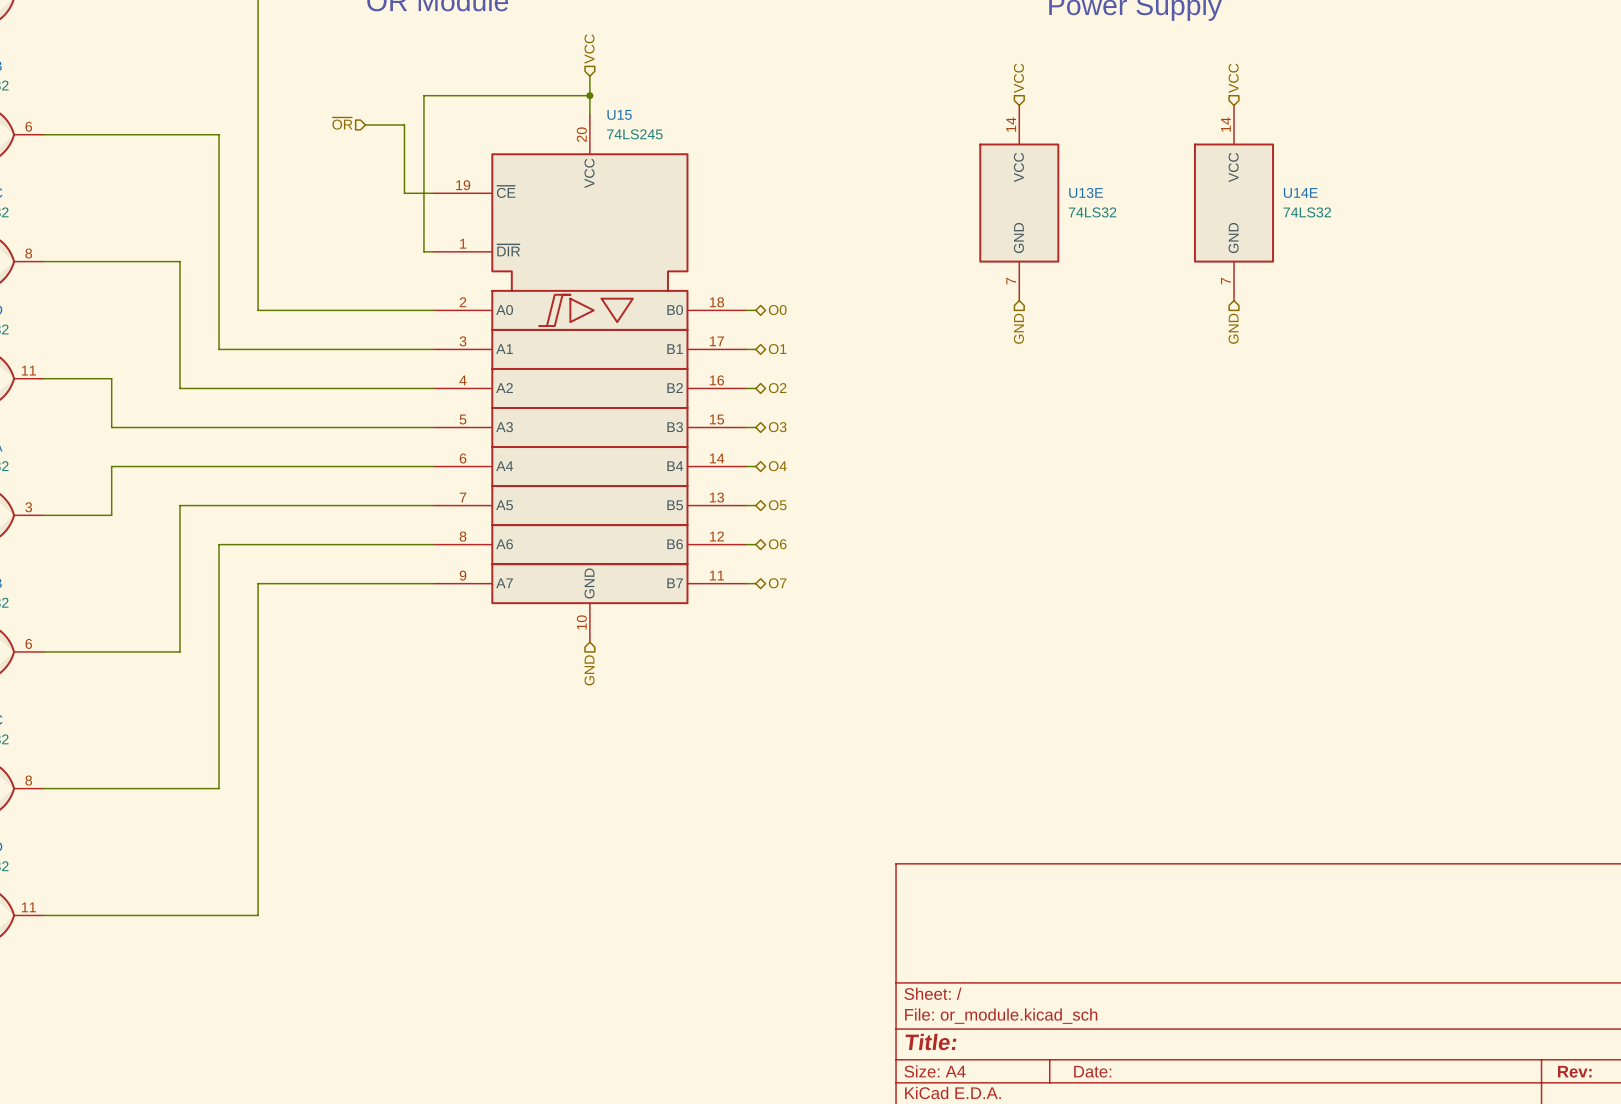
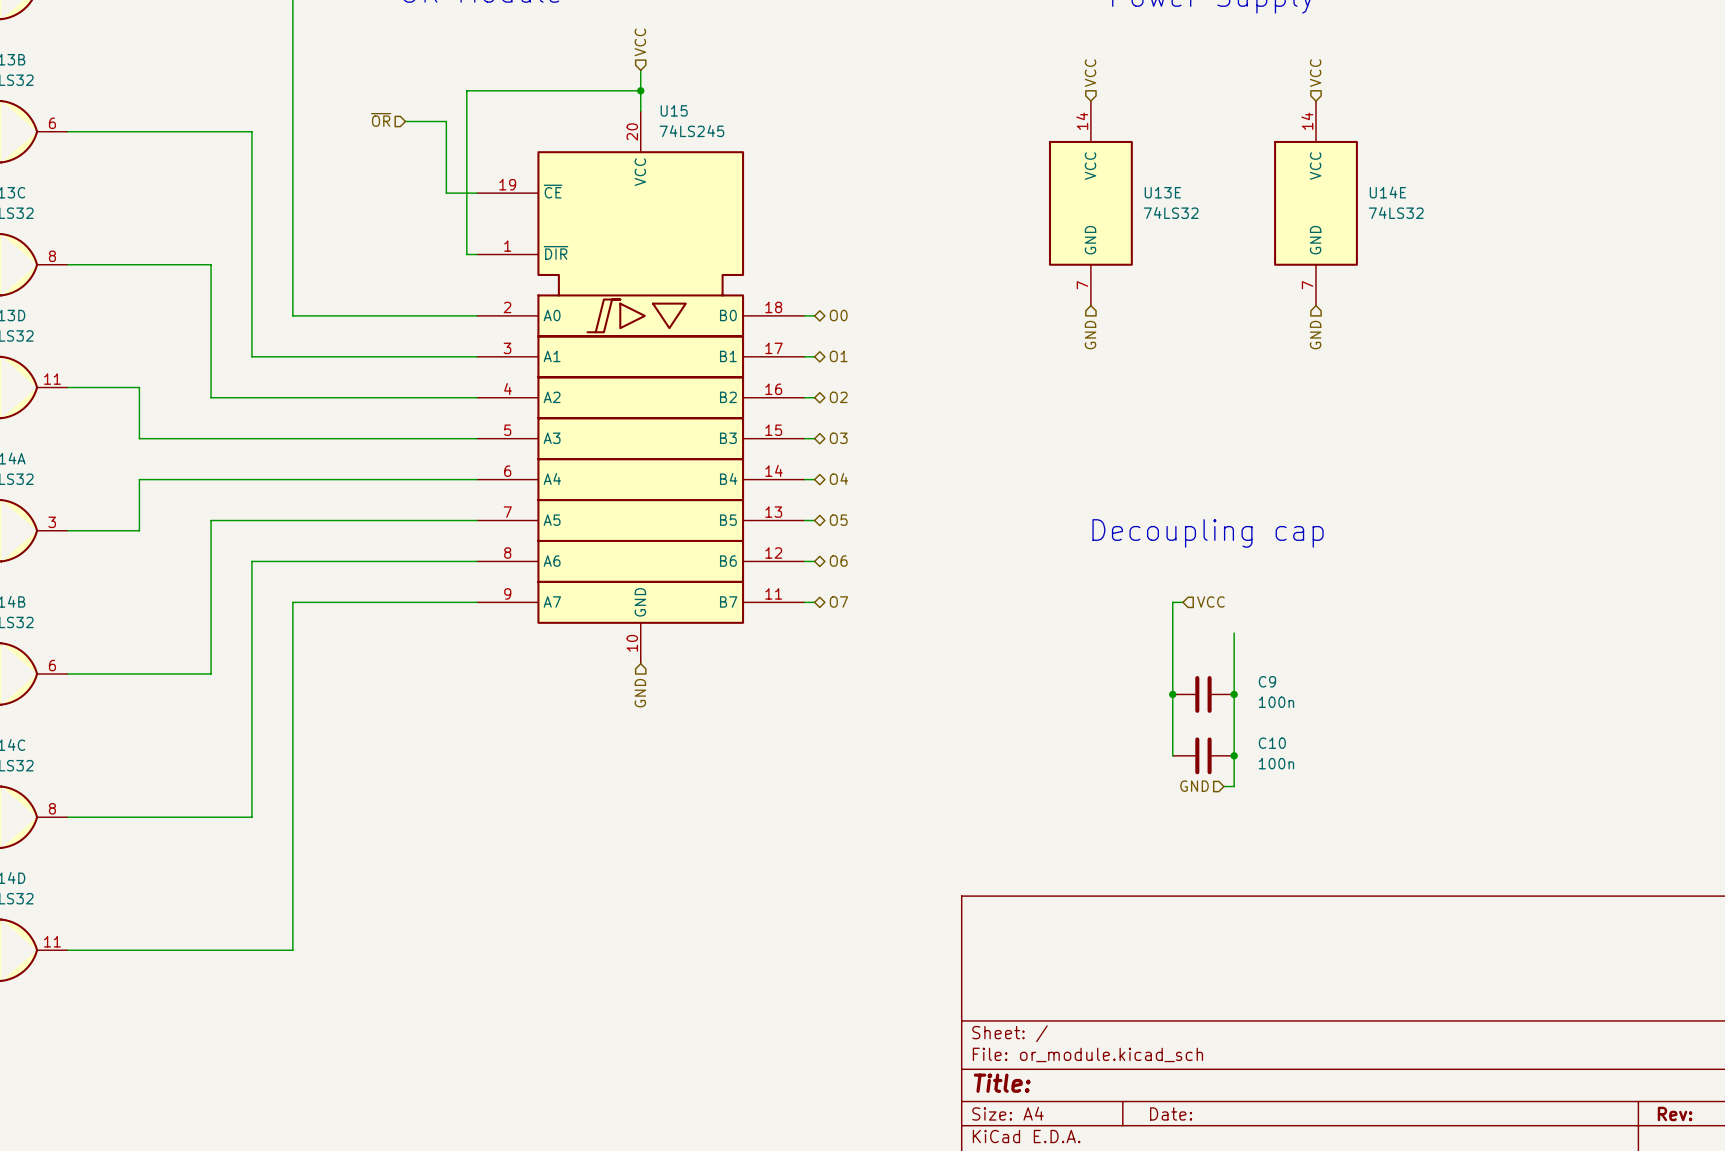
text: none -> Decoupling cap (1208, 533)
wire: none -> (1182, 602) (1172, 602) (1172, 755)
hierarchical label: none -> VCC (1210, 601)
wire: none -> (1234, 633) (1234, 786) (1223, 786)
junction: none -> (1172, 694)
C9: none -> 100n (1203, 694)
junction: none -> (1234, 694)
C10: none -> 100n (1203, 755)
junction: none -> (1234, 755)
hierarchical label: none -> GND (1194, 786)

